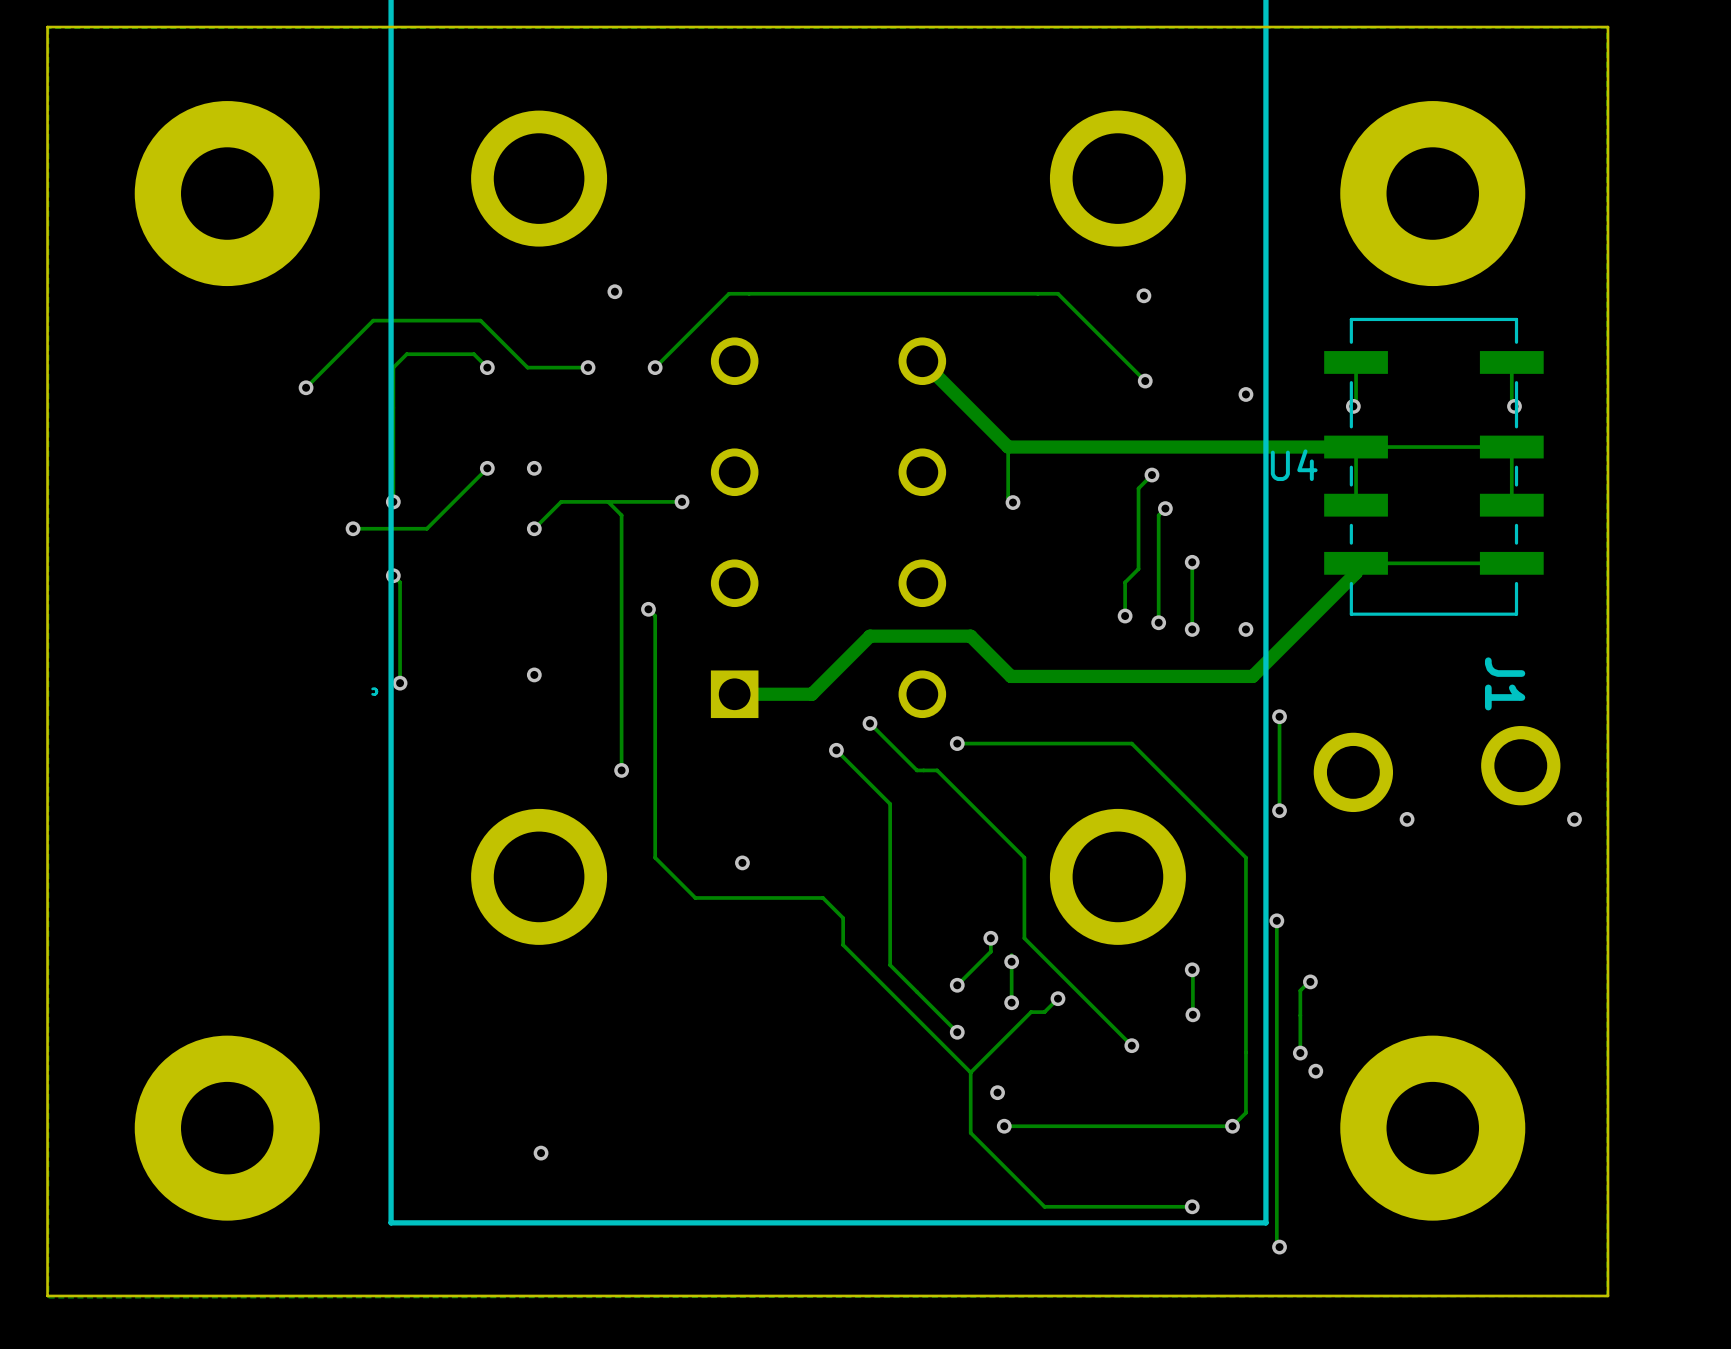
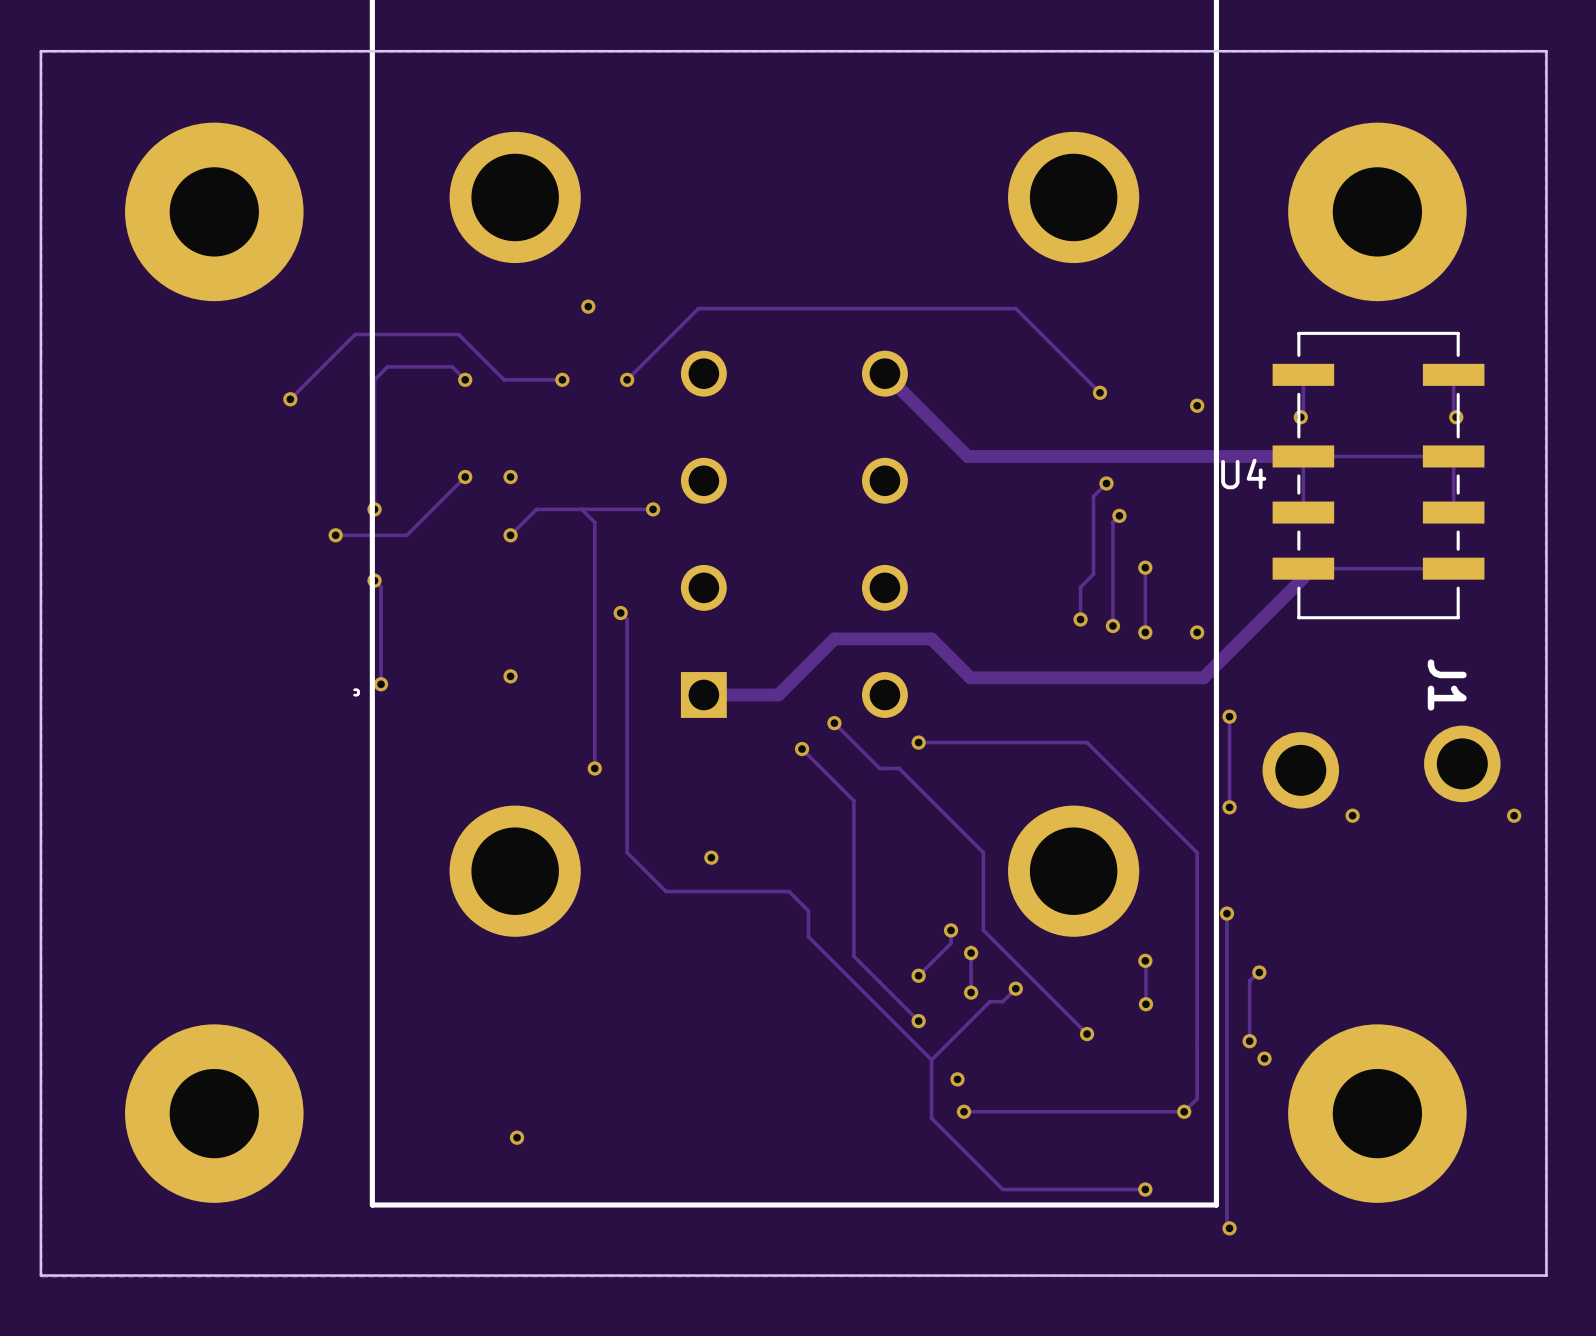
via: (1143, 295) -> none
track: (1008, 447) (1008, 497) (1013, 502) -> none
via: (1013, 502) -> none

